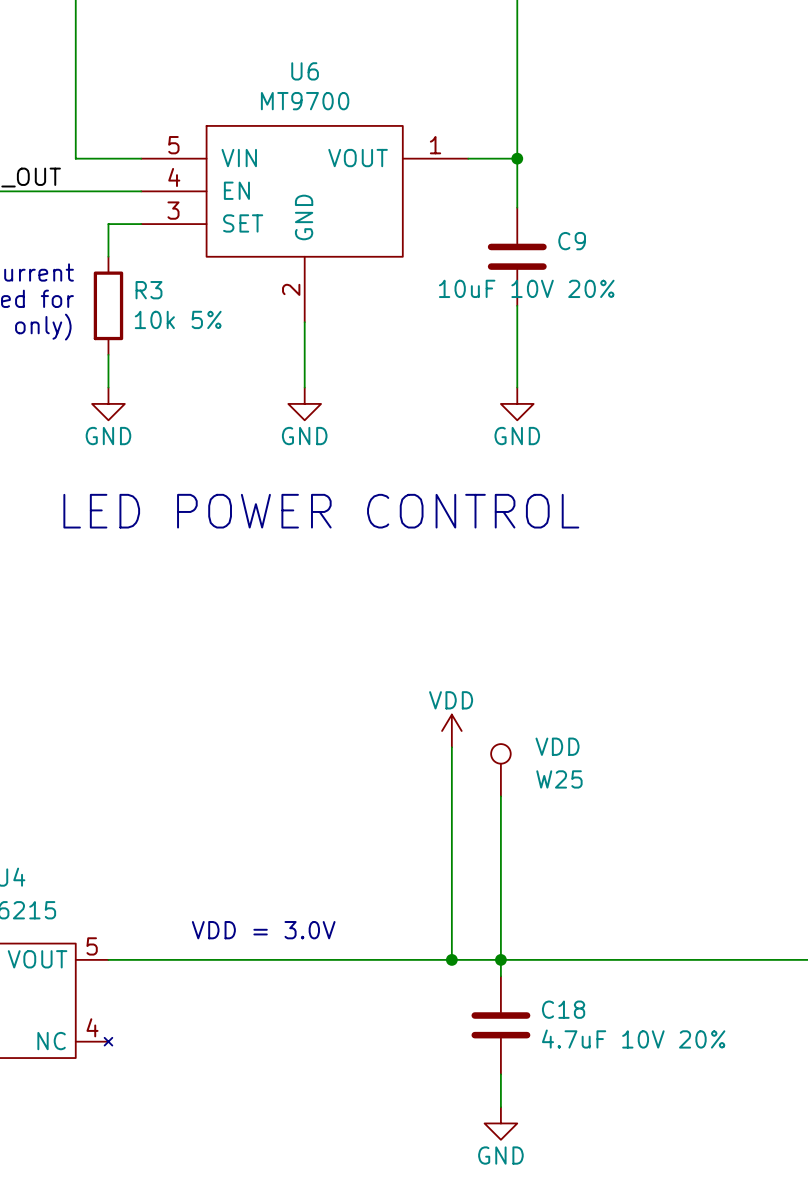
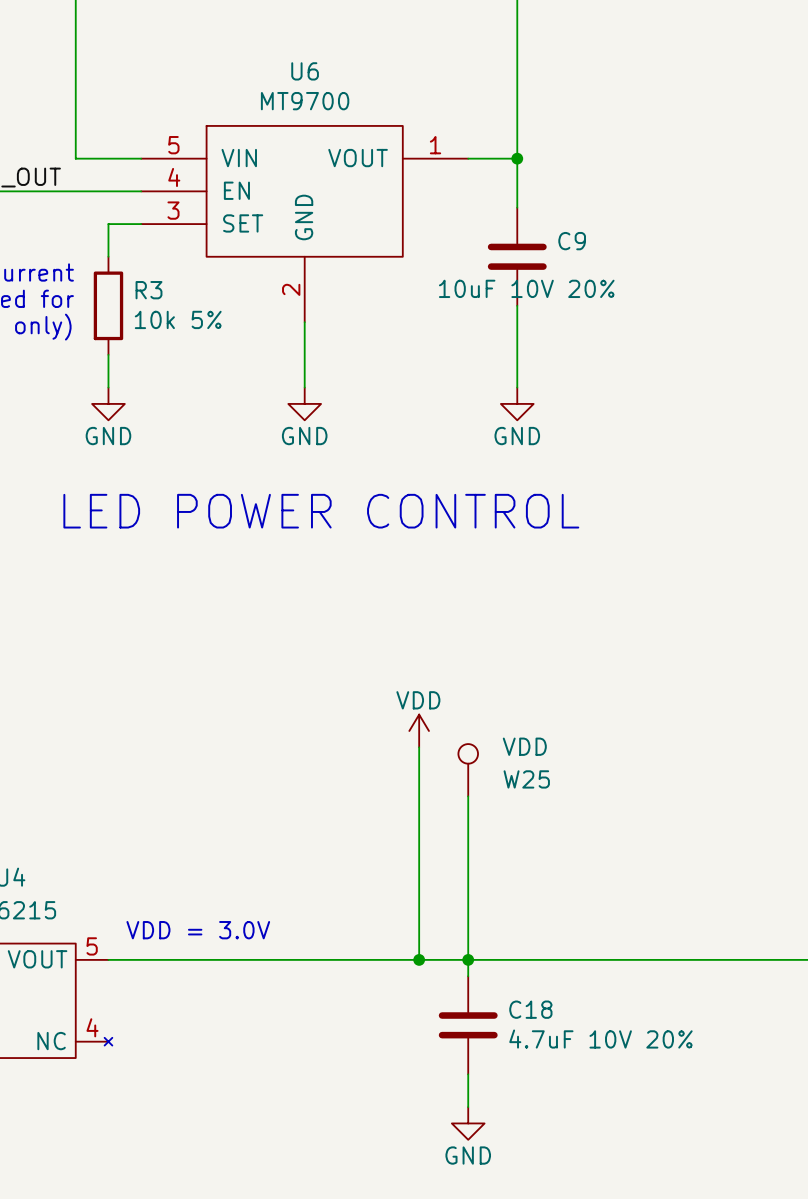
power symbol position: VDD (451, 730) -> VDD (419, 730)
wire: (451, 747) (451, 959) -> (419, 747) (419, 959)
W25 position: (500, 770) -> (468, 770)
wire: (500, 796) (500, 976) -> (468, 796) (468, 976)
text position: VDD = 3.0V (263, 930) -> VDD = 3.0V (198, 930)
junction: none -> (419, 959)
junction: (451, 959) -> none
junction: none -> (468, 959)
junction: (500, 959) -> none
C18 position: (500, 1025) -> (468, 1025)
wire: (500, 1074) (500, 1107) -> (468, 1074) (468, 1107)
power symbol position: GND (500, 1123) -> GND (468, 1123)

